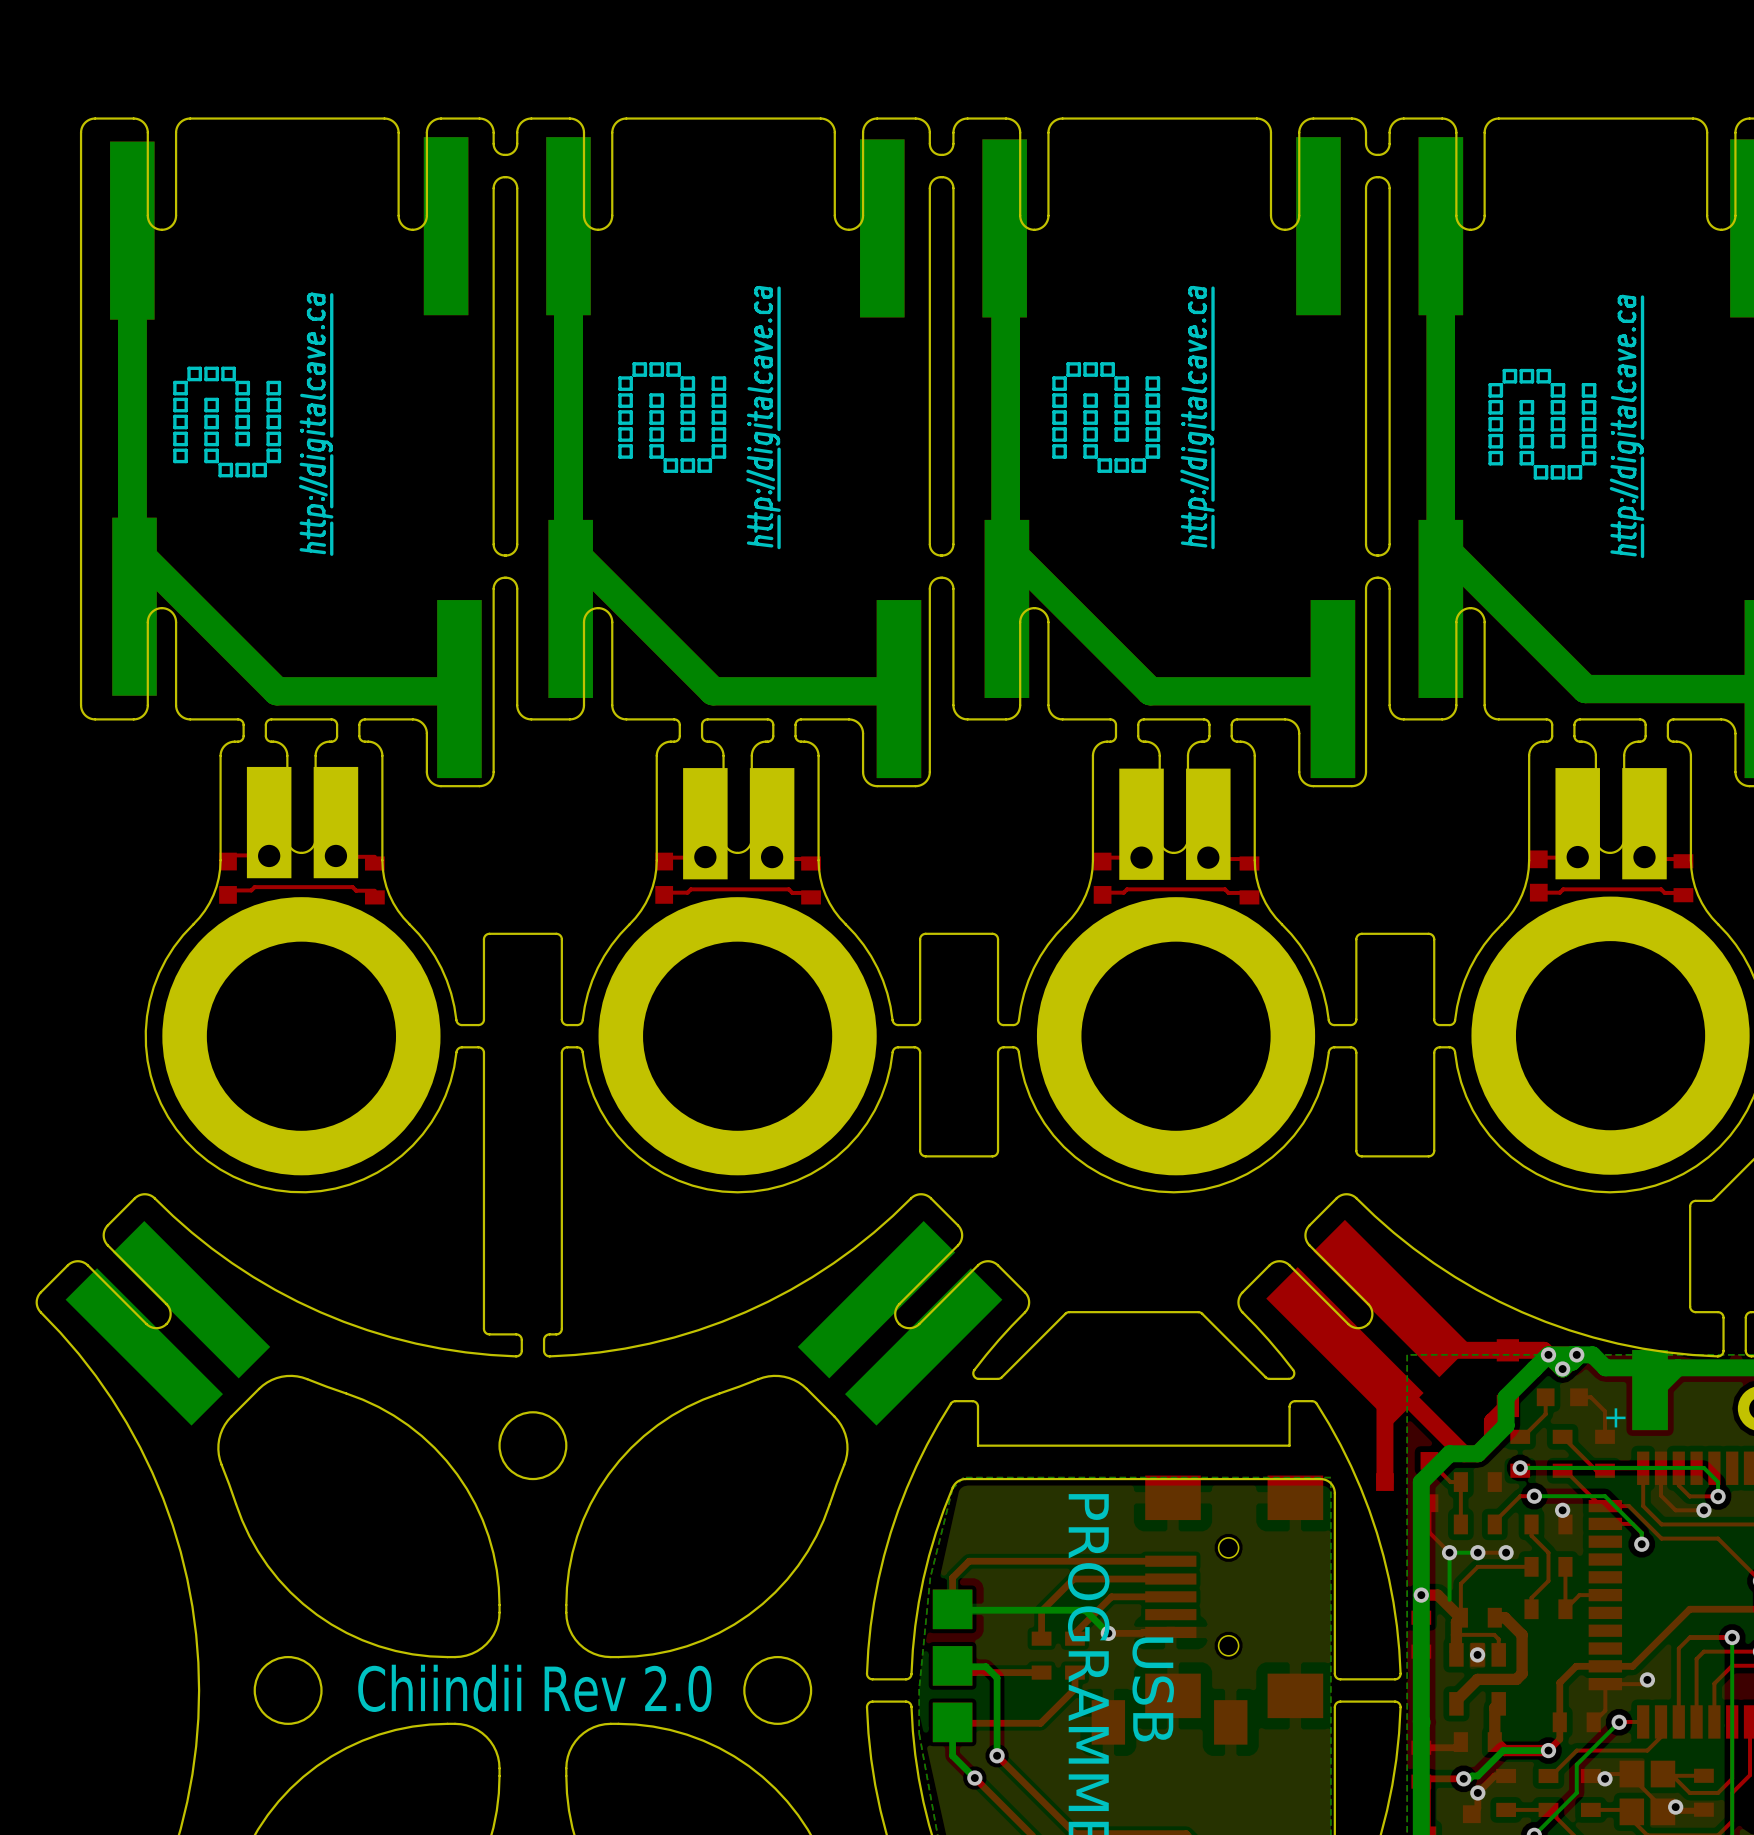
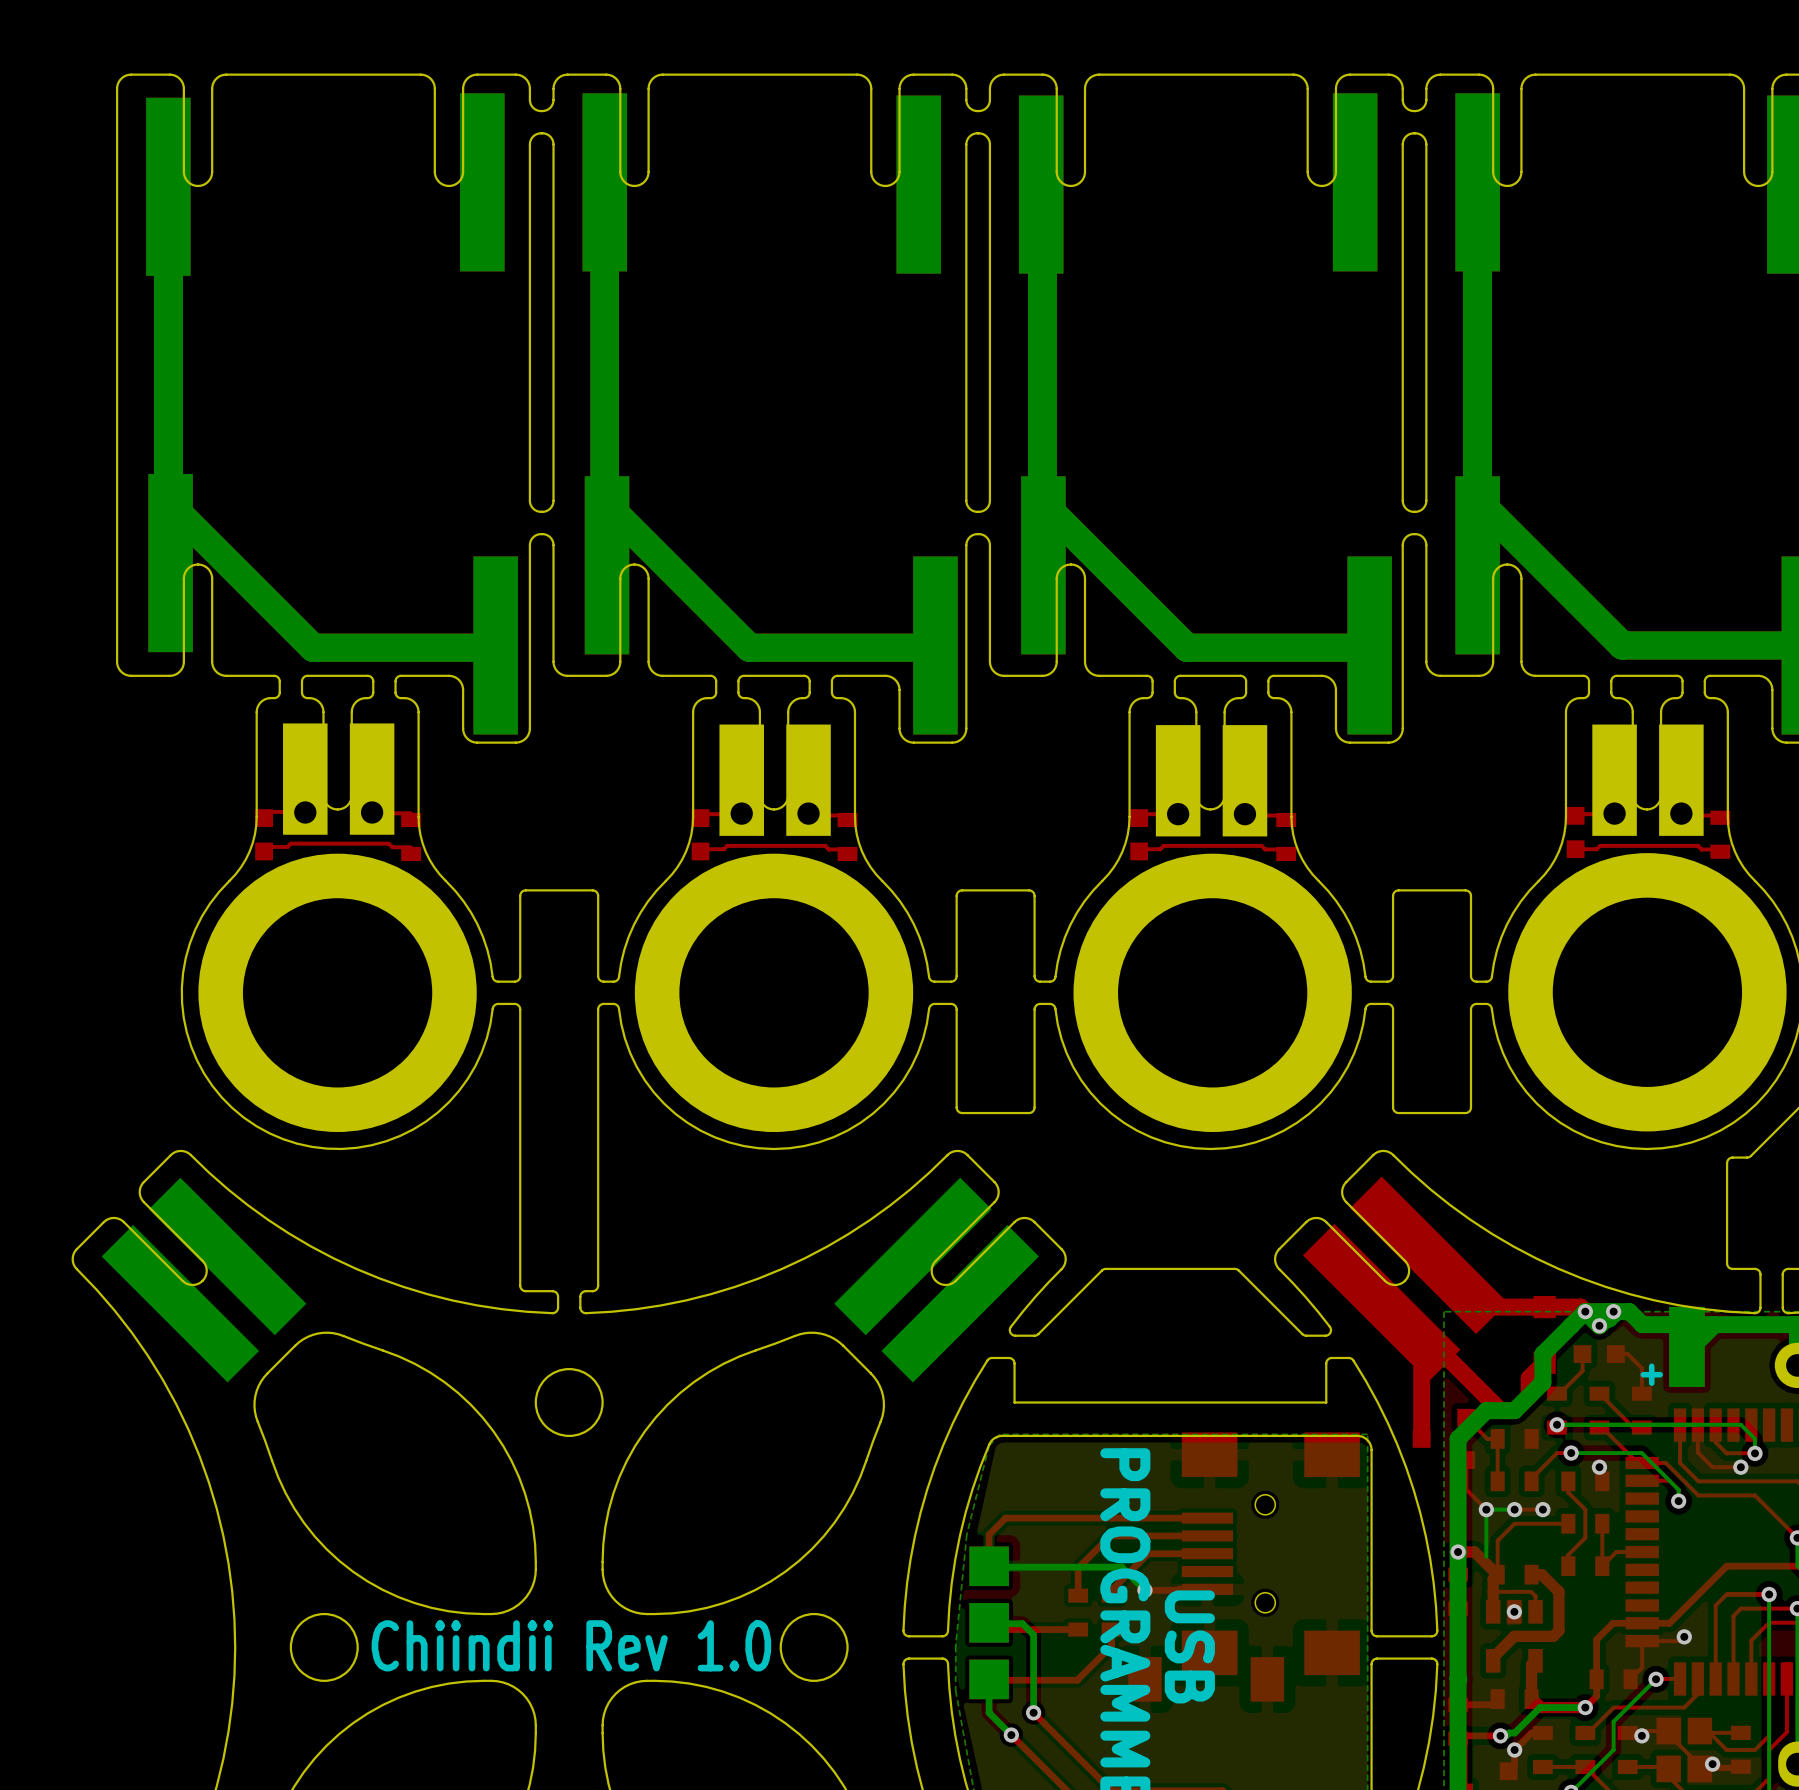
drawing: [618, 285, 781, 550] -> none
drawing: [1052, 285, 1215, 550] -> none
drawing: [173, 292, 334, 556] -> none
drawing: [1488, 294, 1645, 559] -> none
text: Chiindii Rev 2.0 (534, 1688) -> Chiindii Rev 1.0 (571, 1645)

